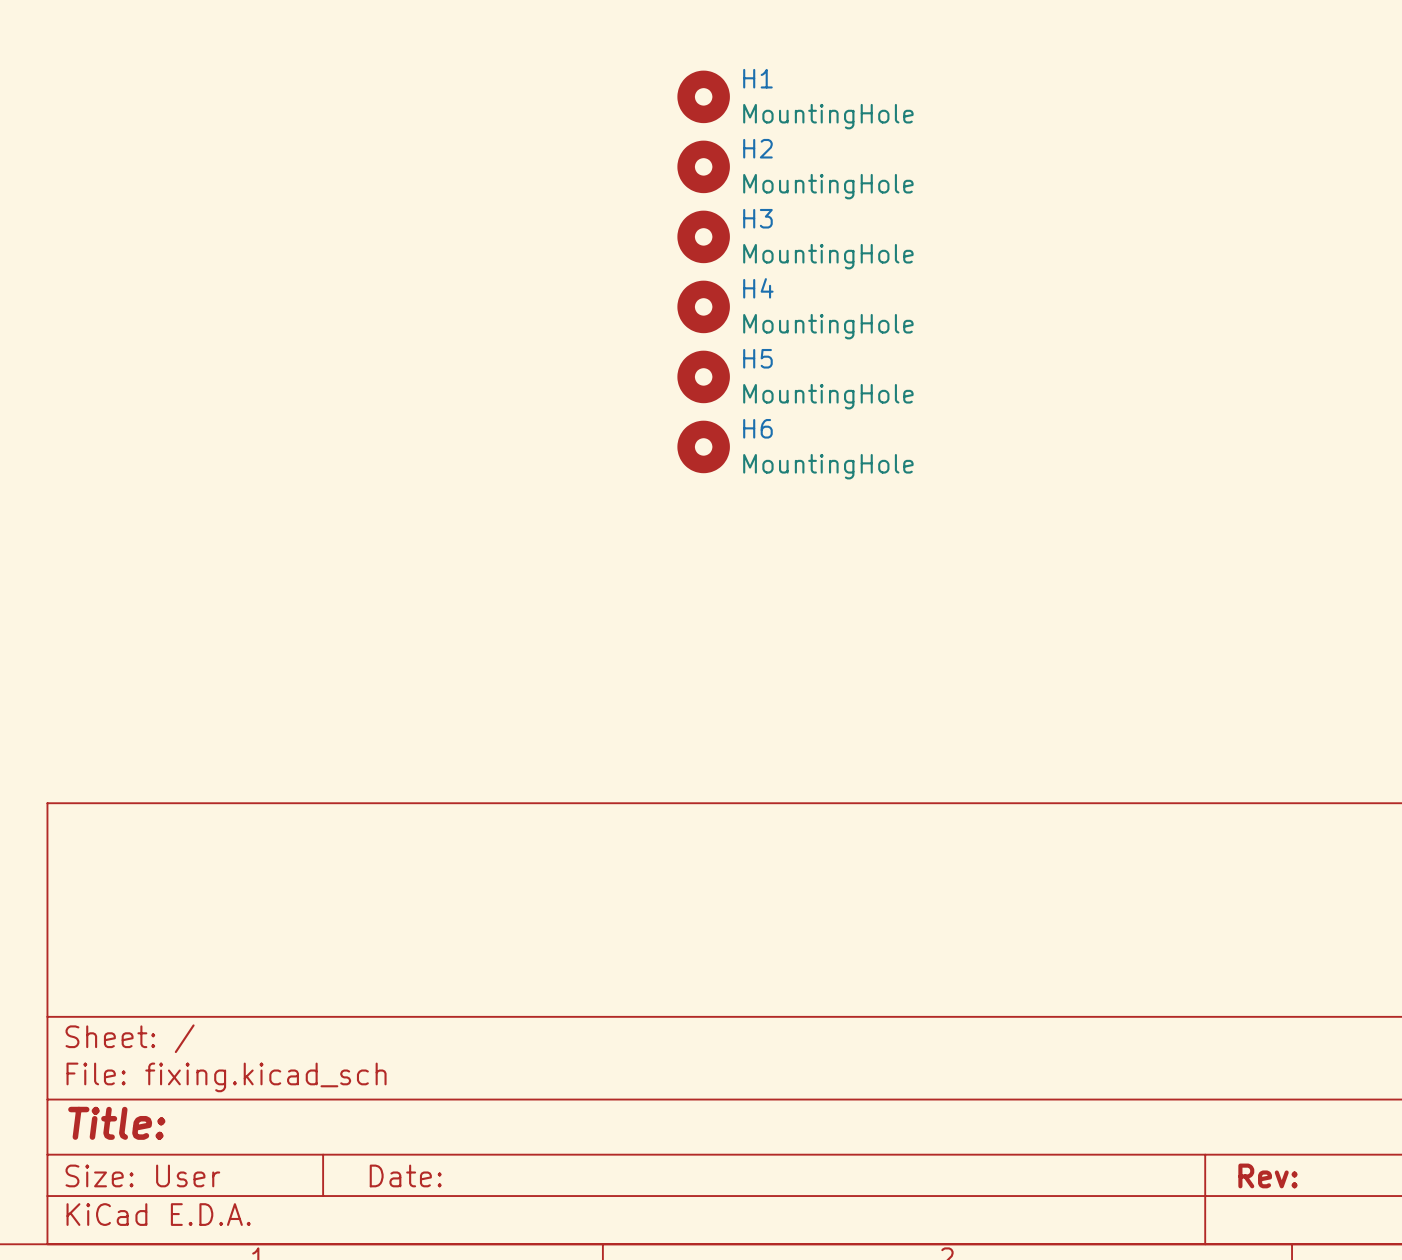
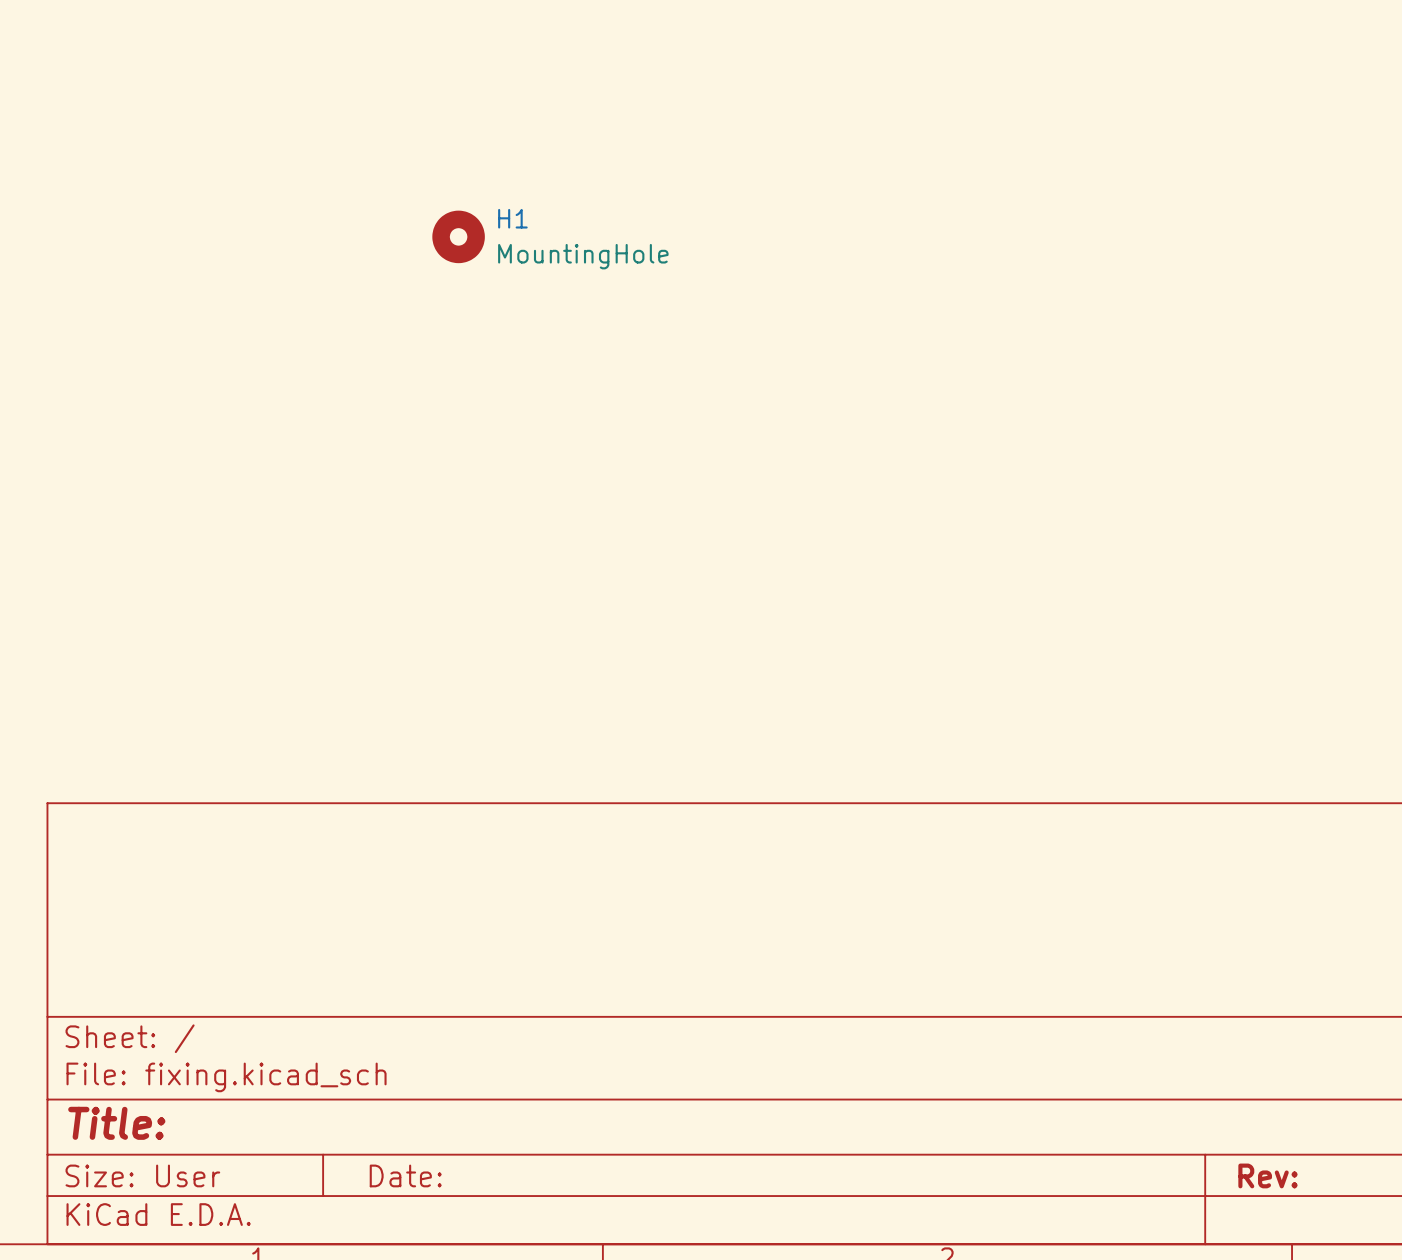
H1 position: (703, 96) -> (458, 236)
H2: MountingHole (703, 166) -> none
H3: MountingHole (703, 236) -> none
H4: MountingHole (703, 306) -> none
H5: MountingHole (703, 376) -> none
H6: MountingHole (703, 446) -> none

